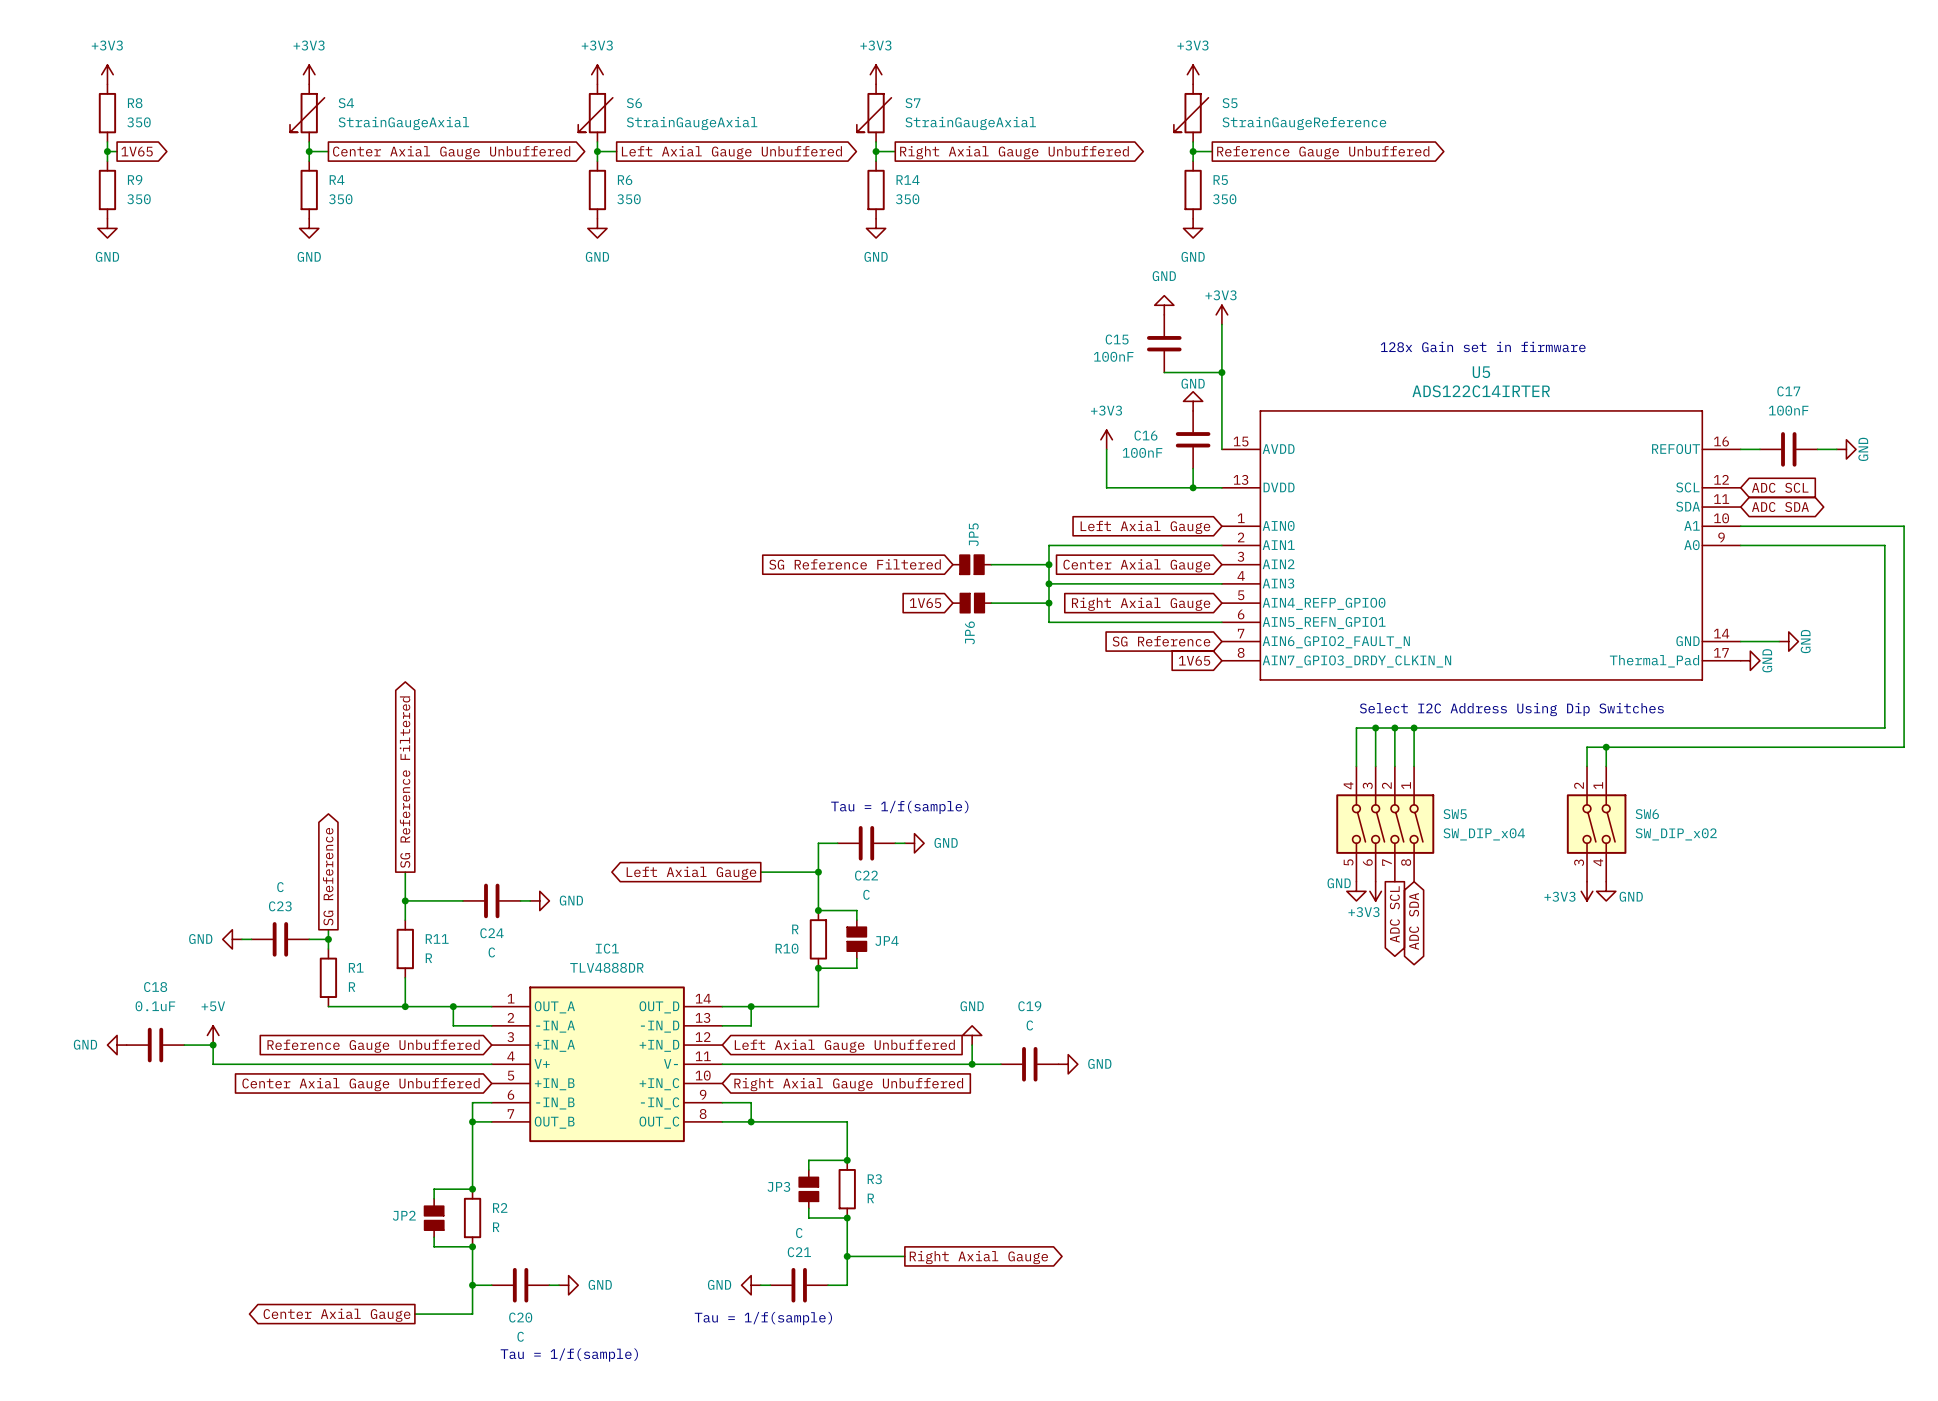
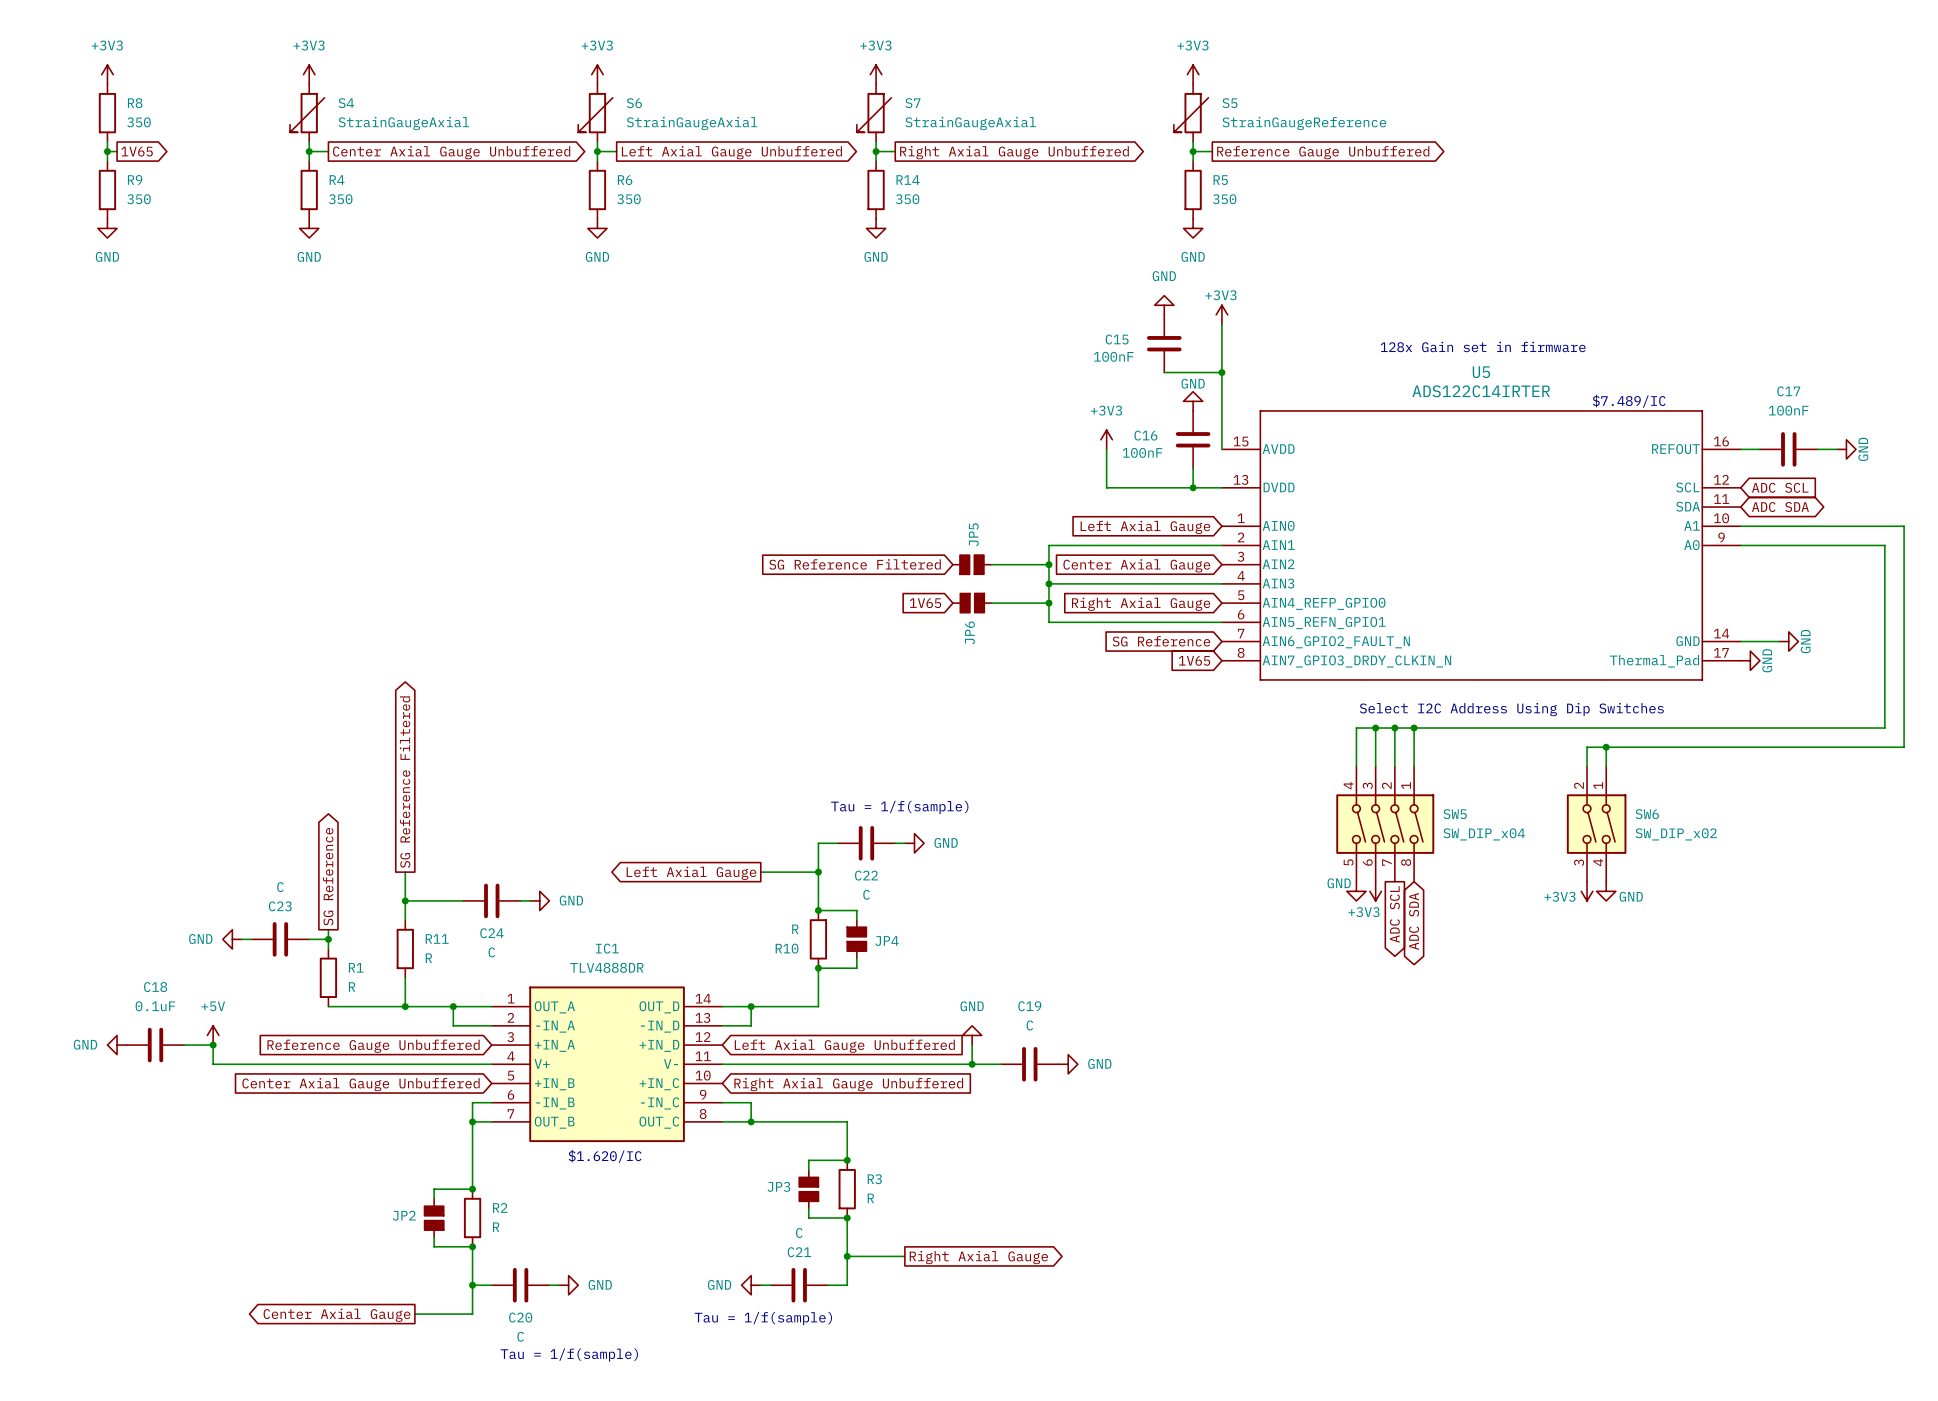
text: none -> $7.489/IC (1629, 401)
text: none -> $1.620/IC (605, 1156)

